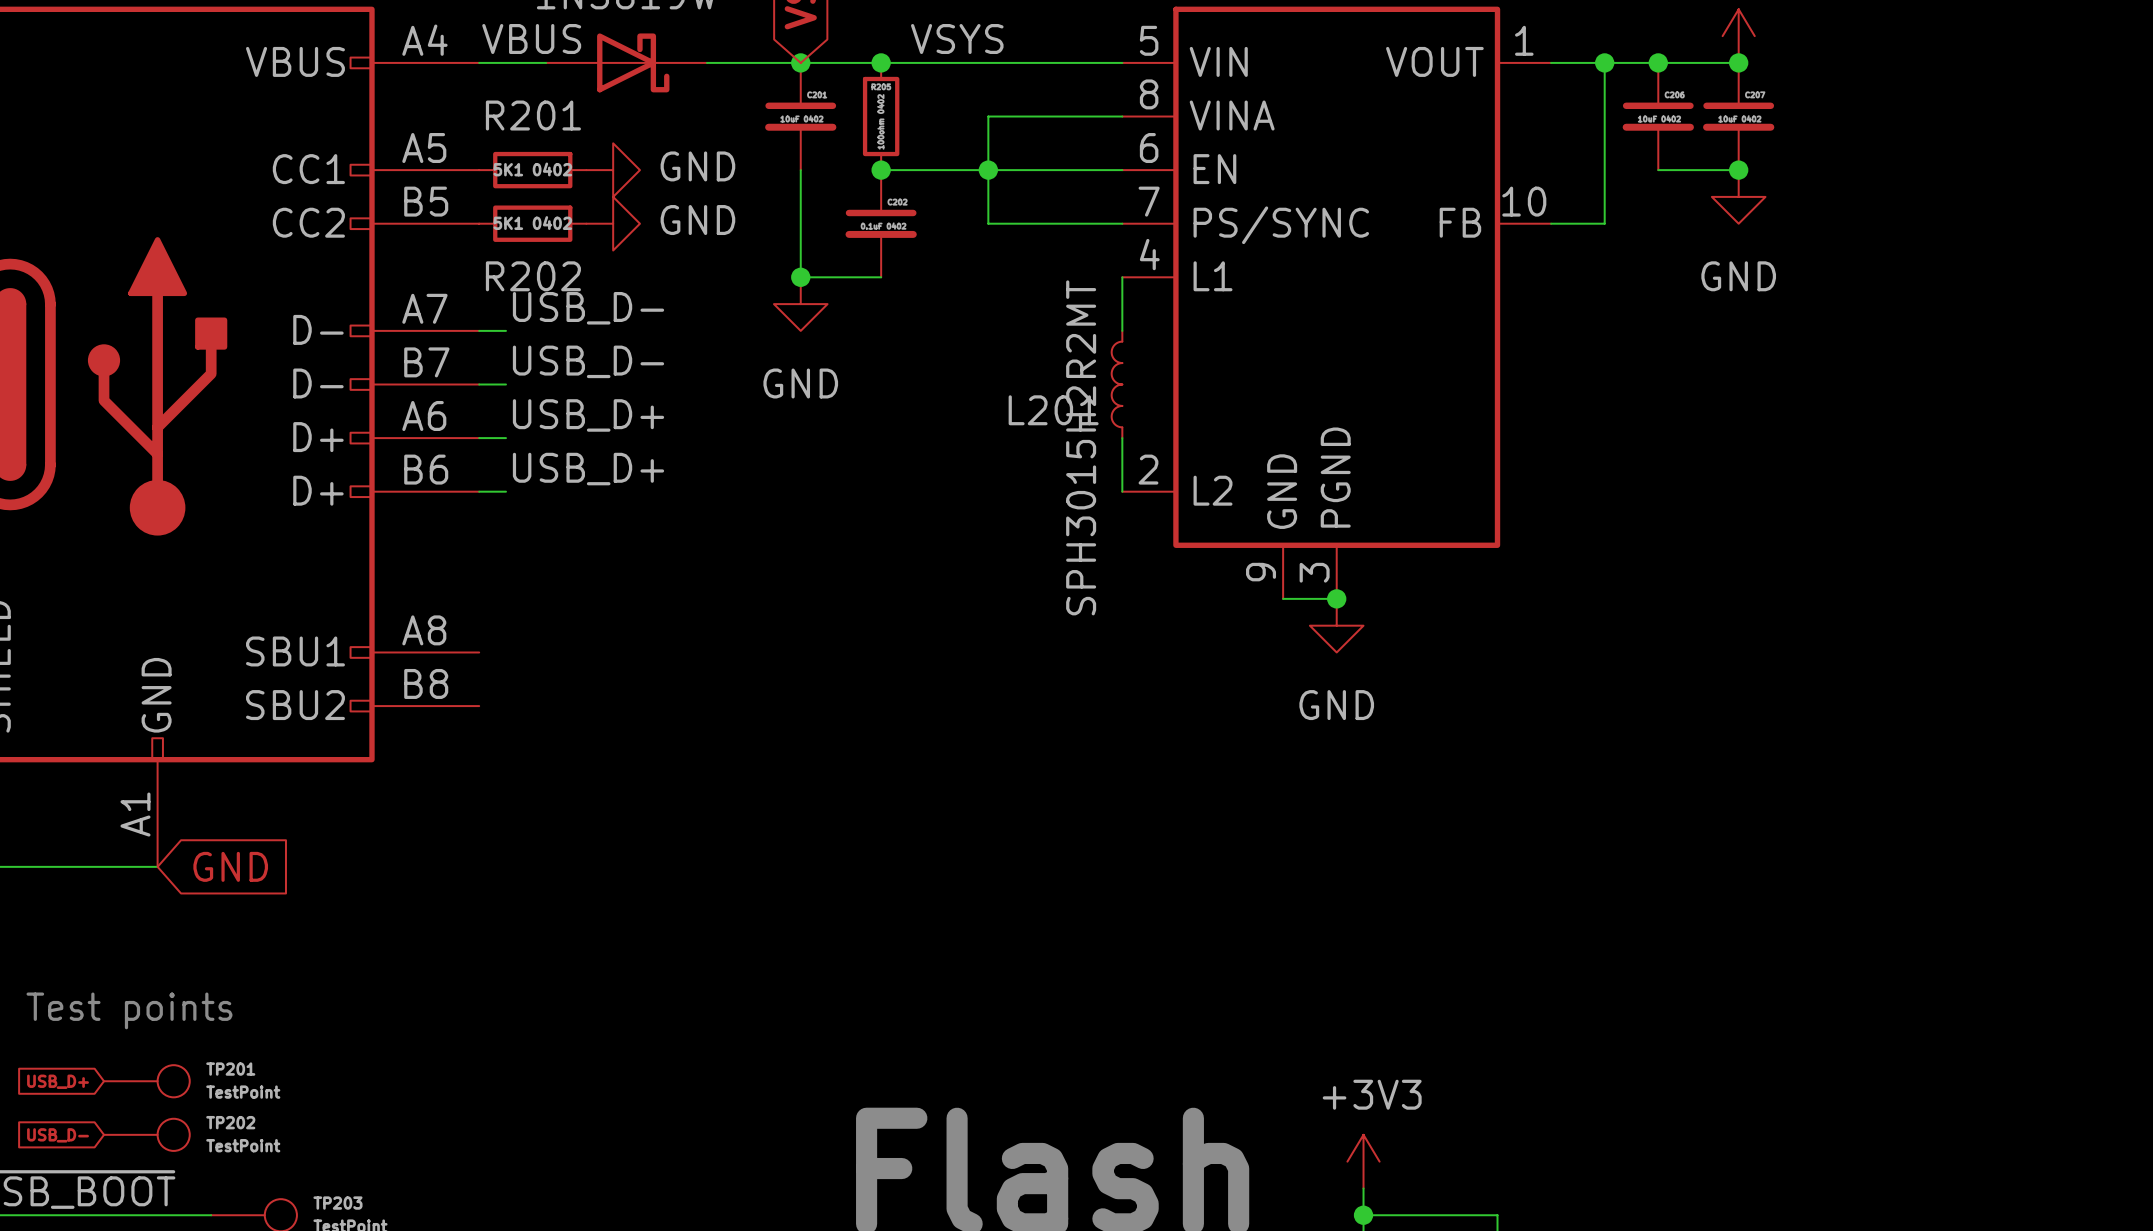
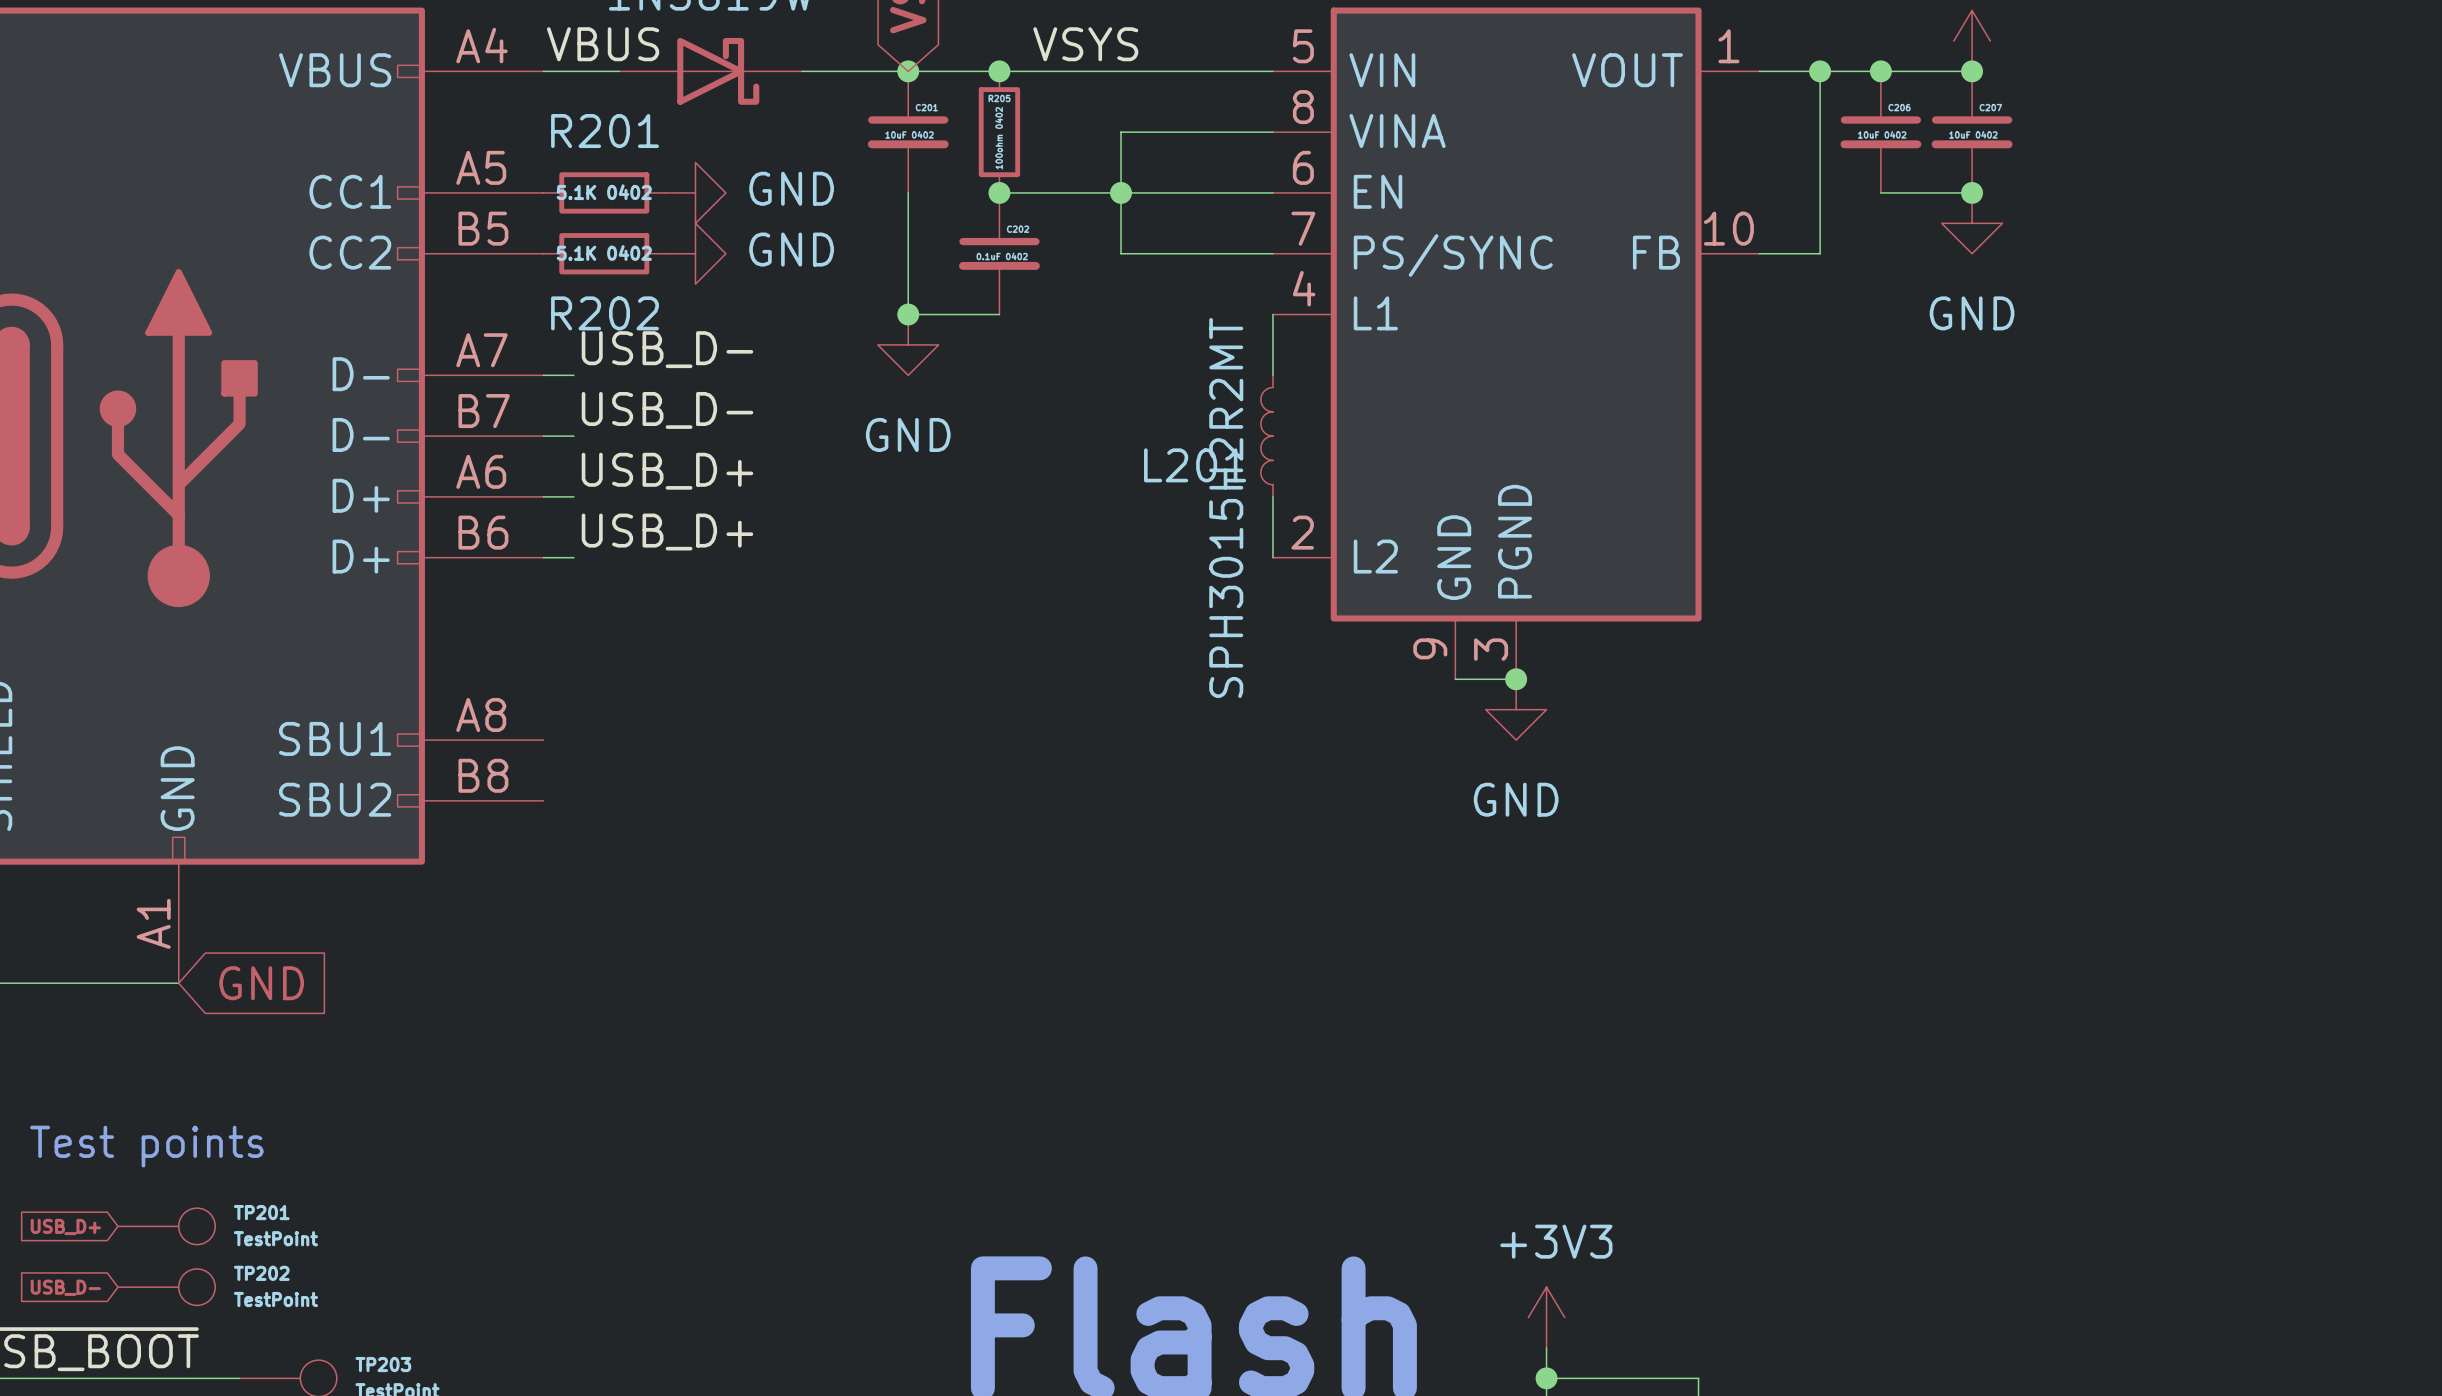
R201 value: 5K1 0402 (532, 169) -> 5.1K 0402 (604, 192)
R202 value: 5K1 0402 (532, 223) -> 5.1K 0402 (604, 252)

